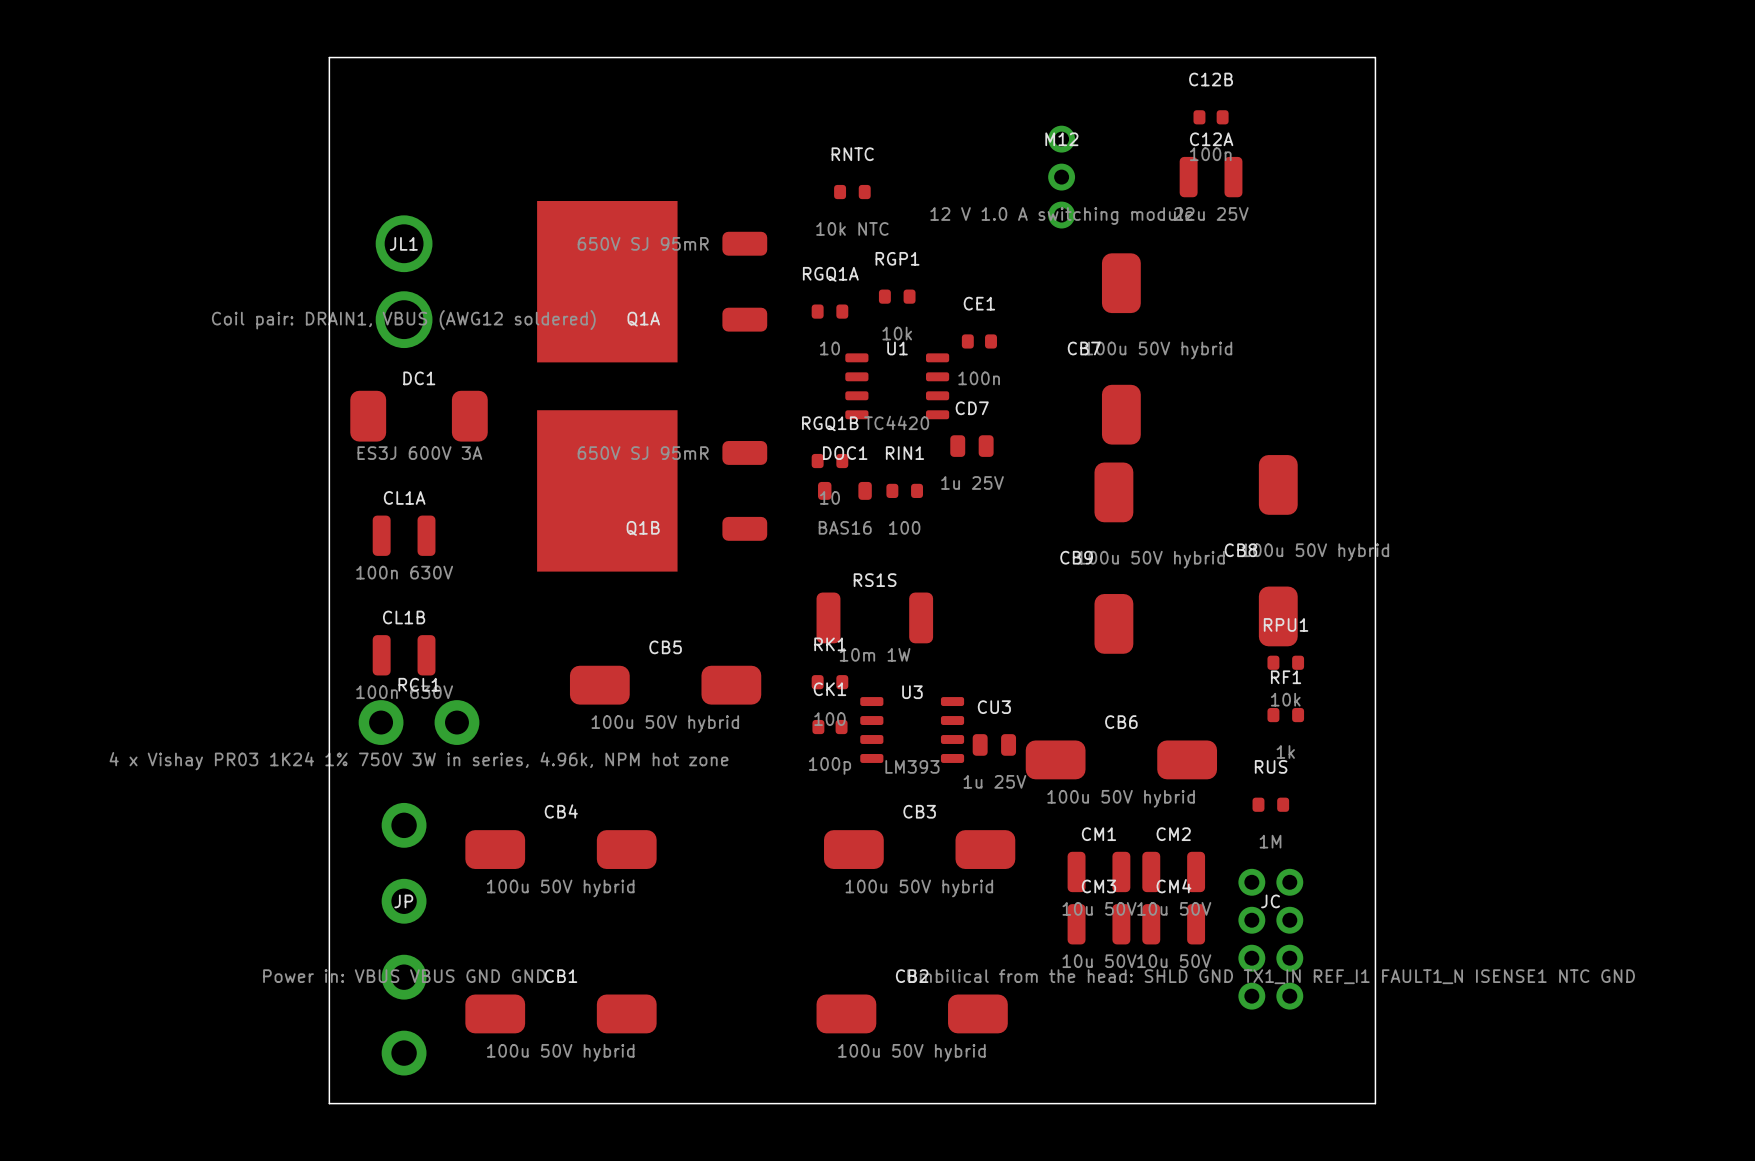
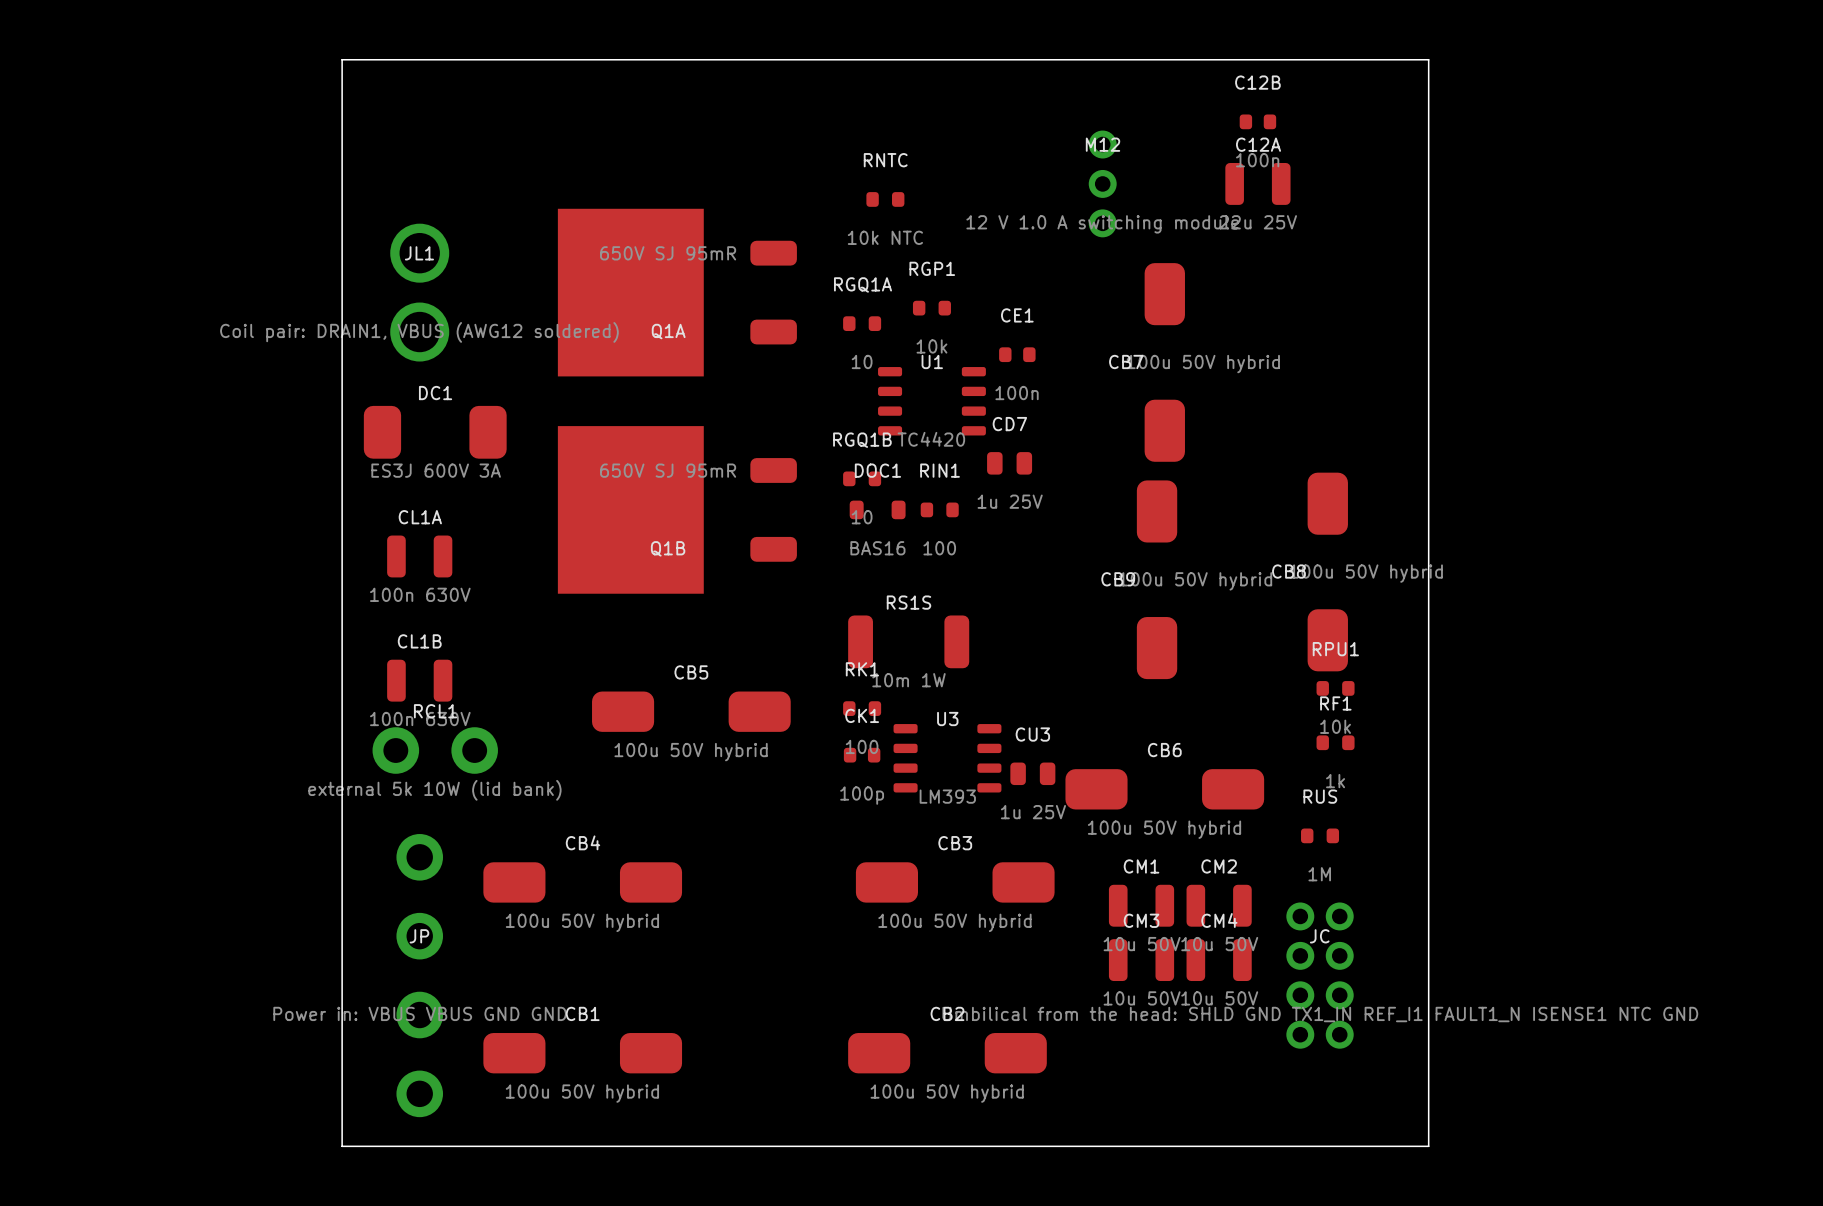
RCL1 value: 4 x Vishay PR03 1K24 1% 750V 3W in series, 4.96k, NPM hot zone (419, 761) -> external 5k 10W (lid bank) (434, 790)

